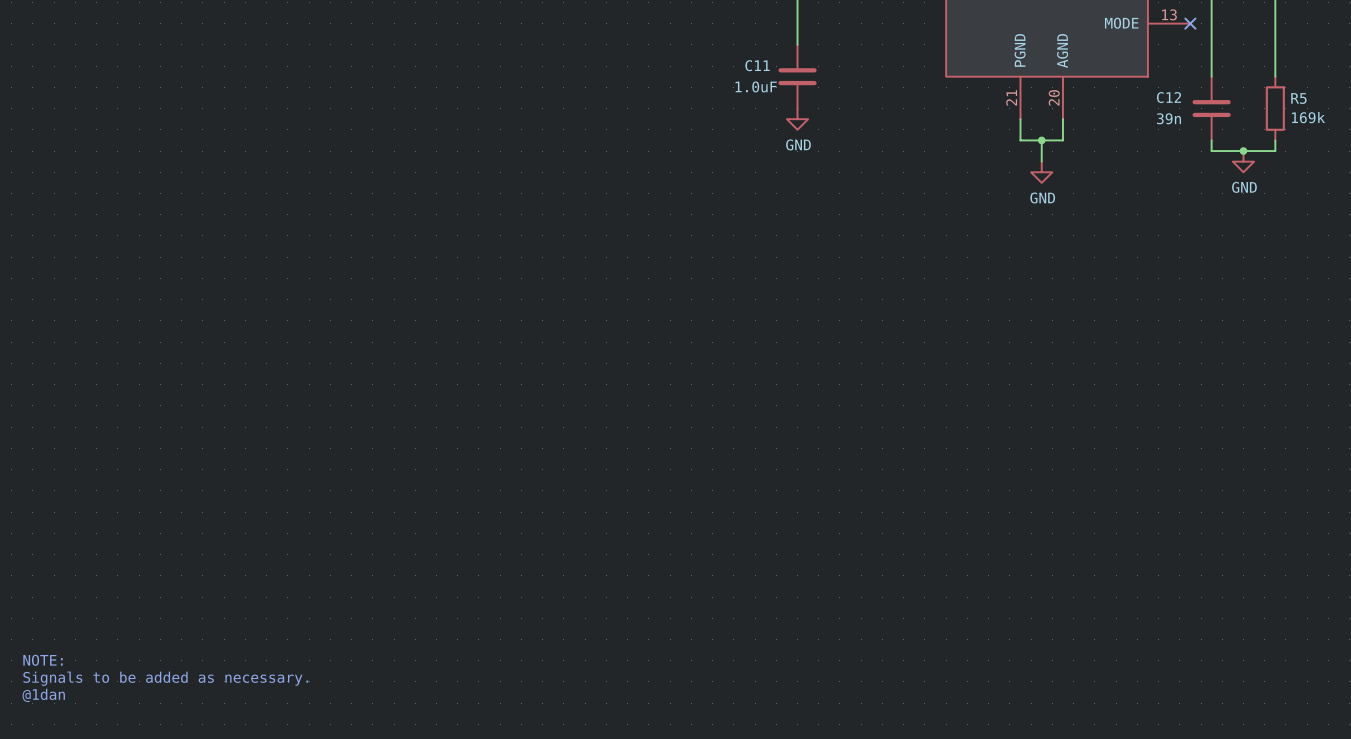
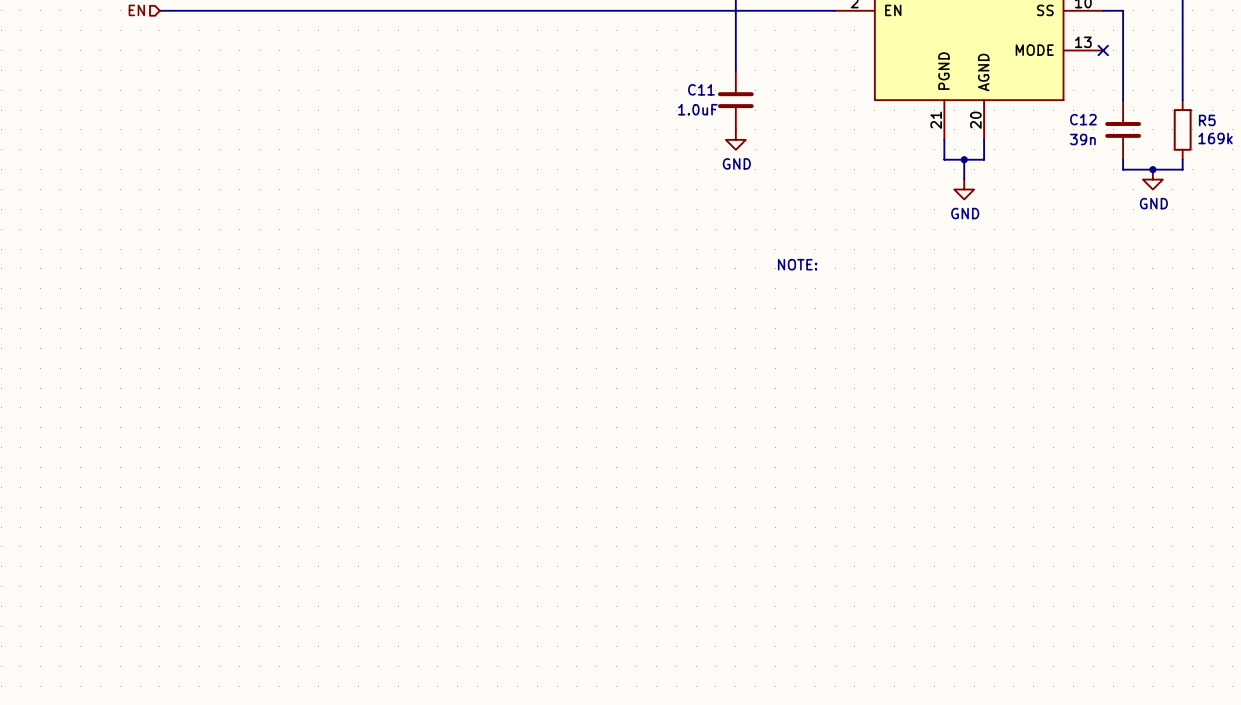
text: none -> NOTE: (797, 264)
text: NOTE: (43, 660) -> none
text: Signals to be added as necessary. (165, 678) -> none
text: @1dan (43, 695) -> none

